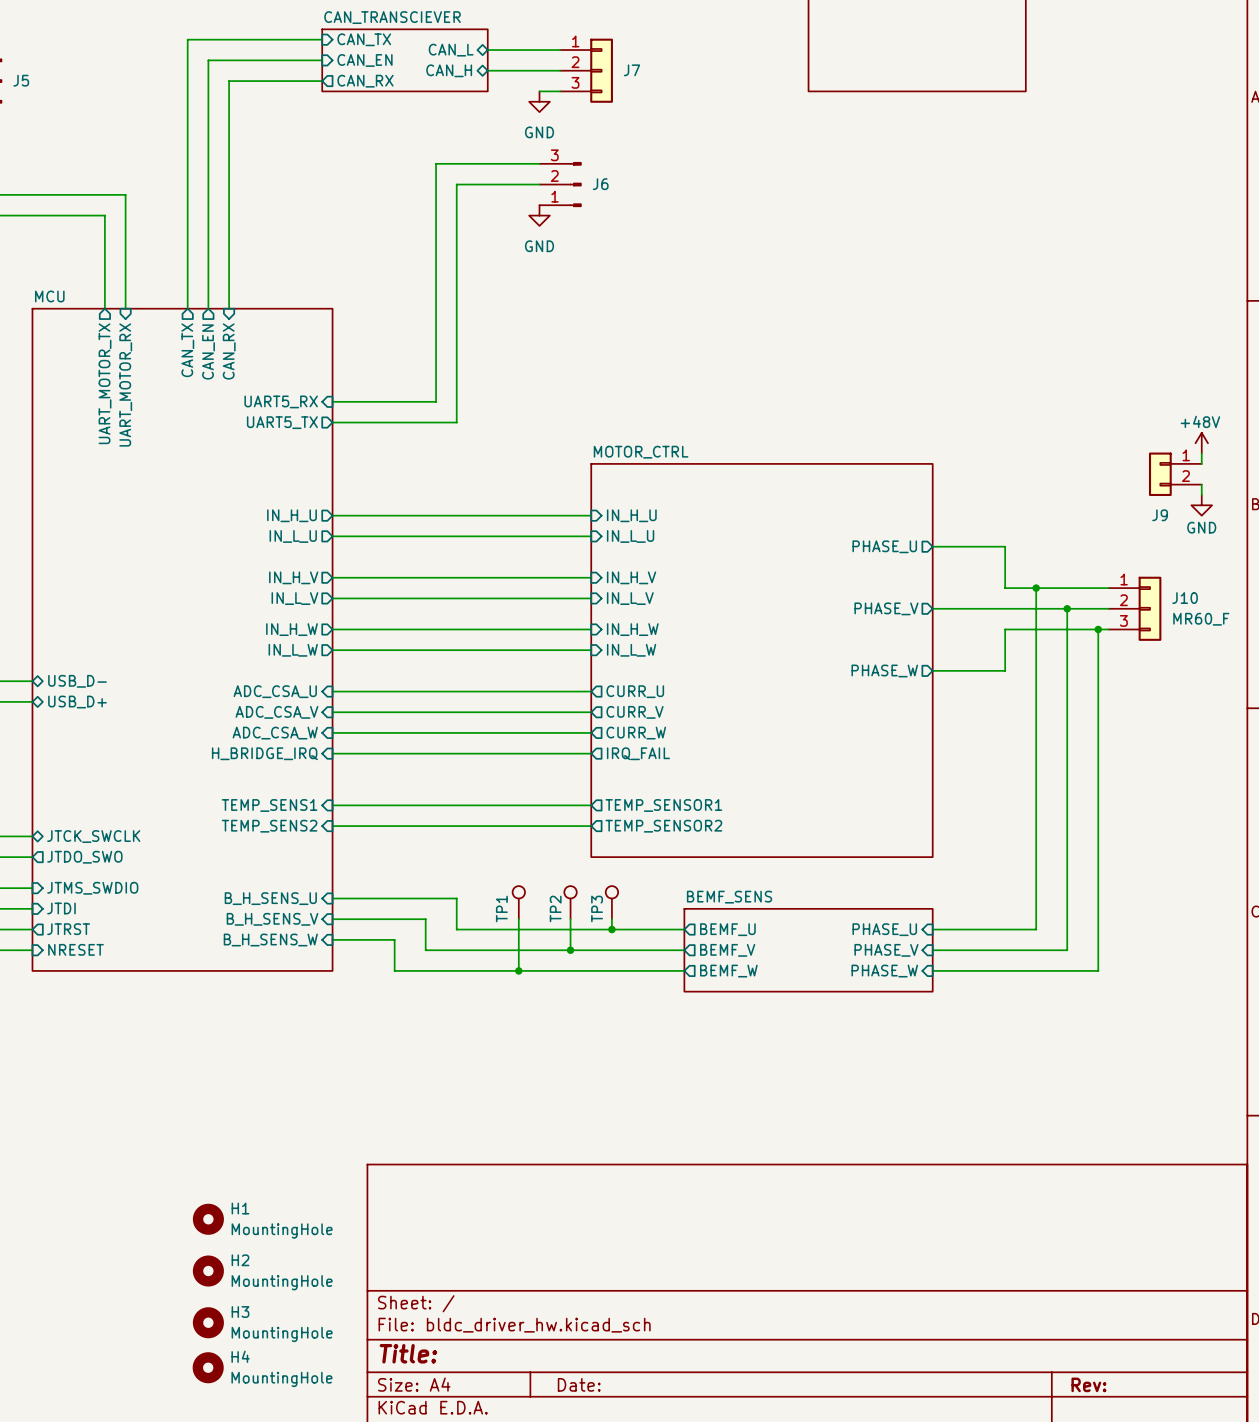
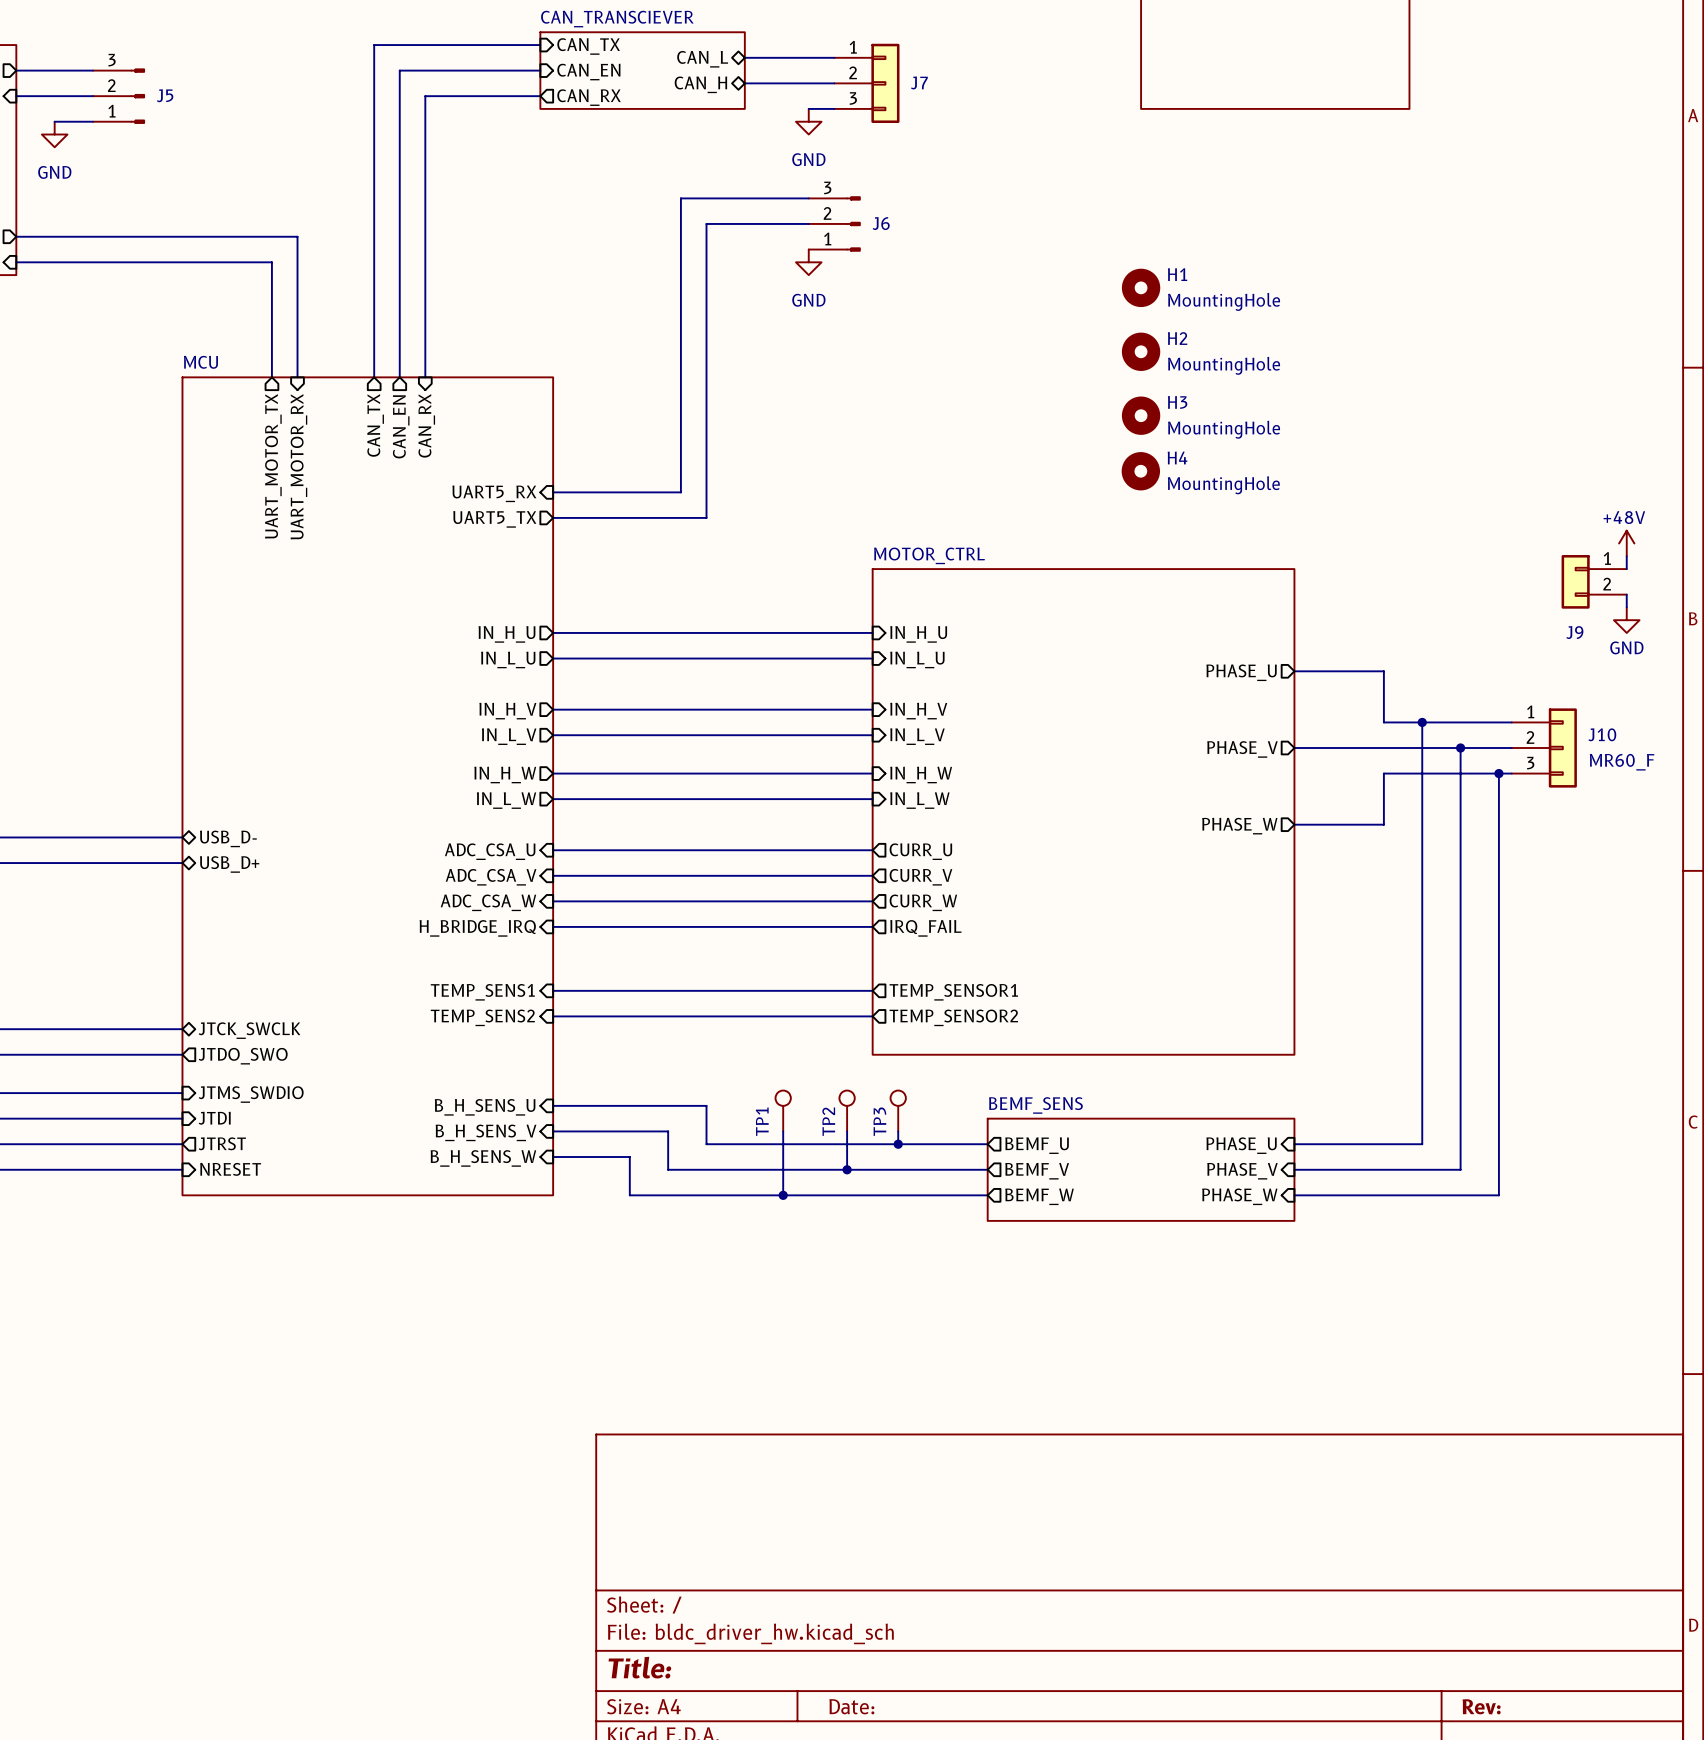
H1 position: (208, 1219) -> (1141, 287)
H2 position: (208, 1271) -> (1141, 351)
H3 position: (208, 1322) -> (1141, 415)
H4 position: (208, 1367) -> (1140, 471)

